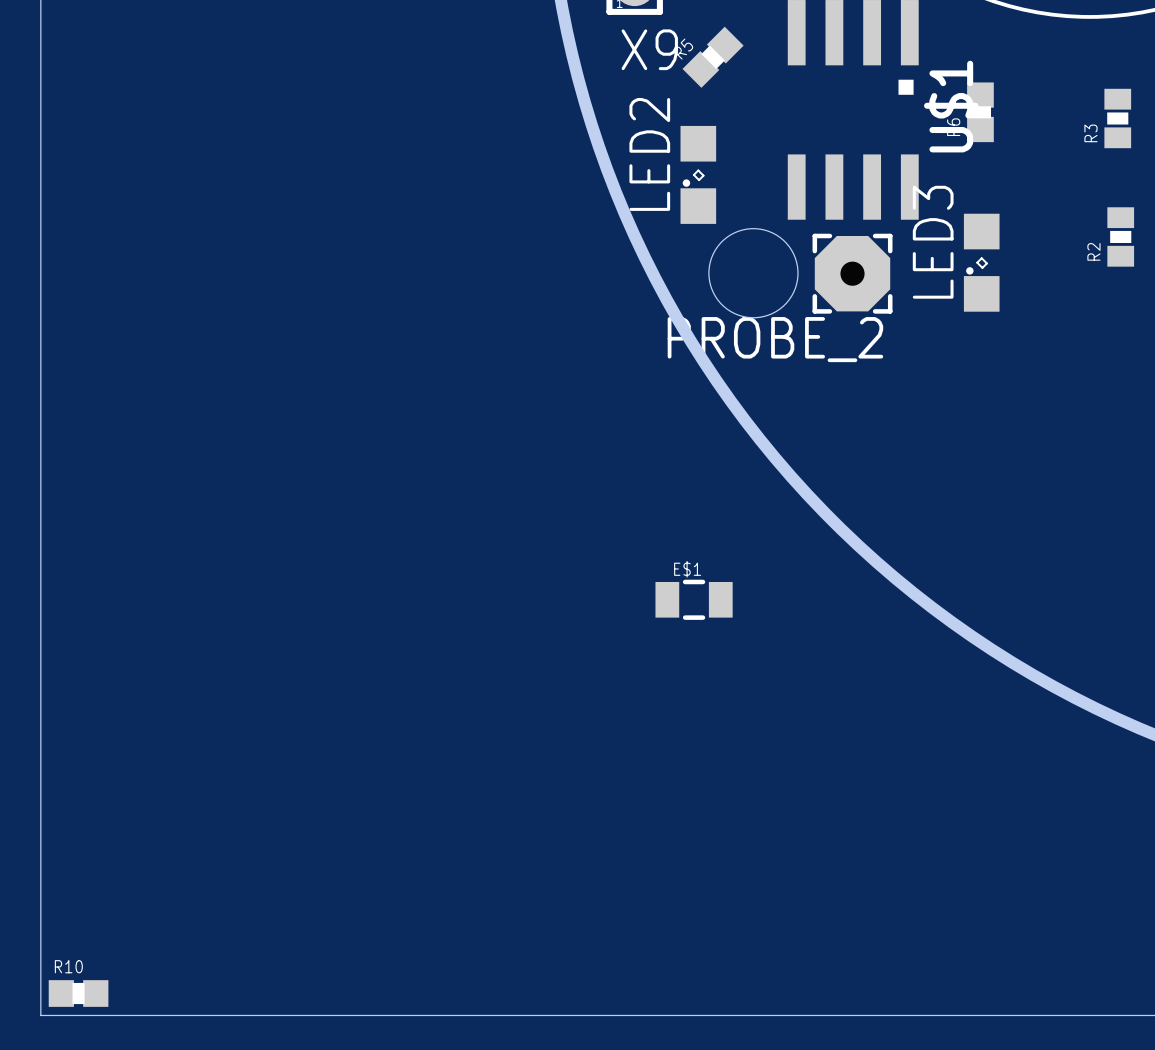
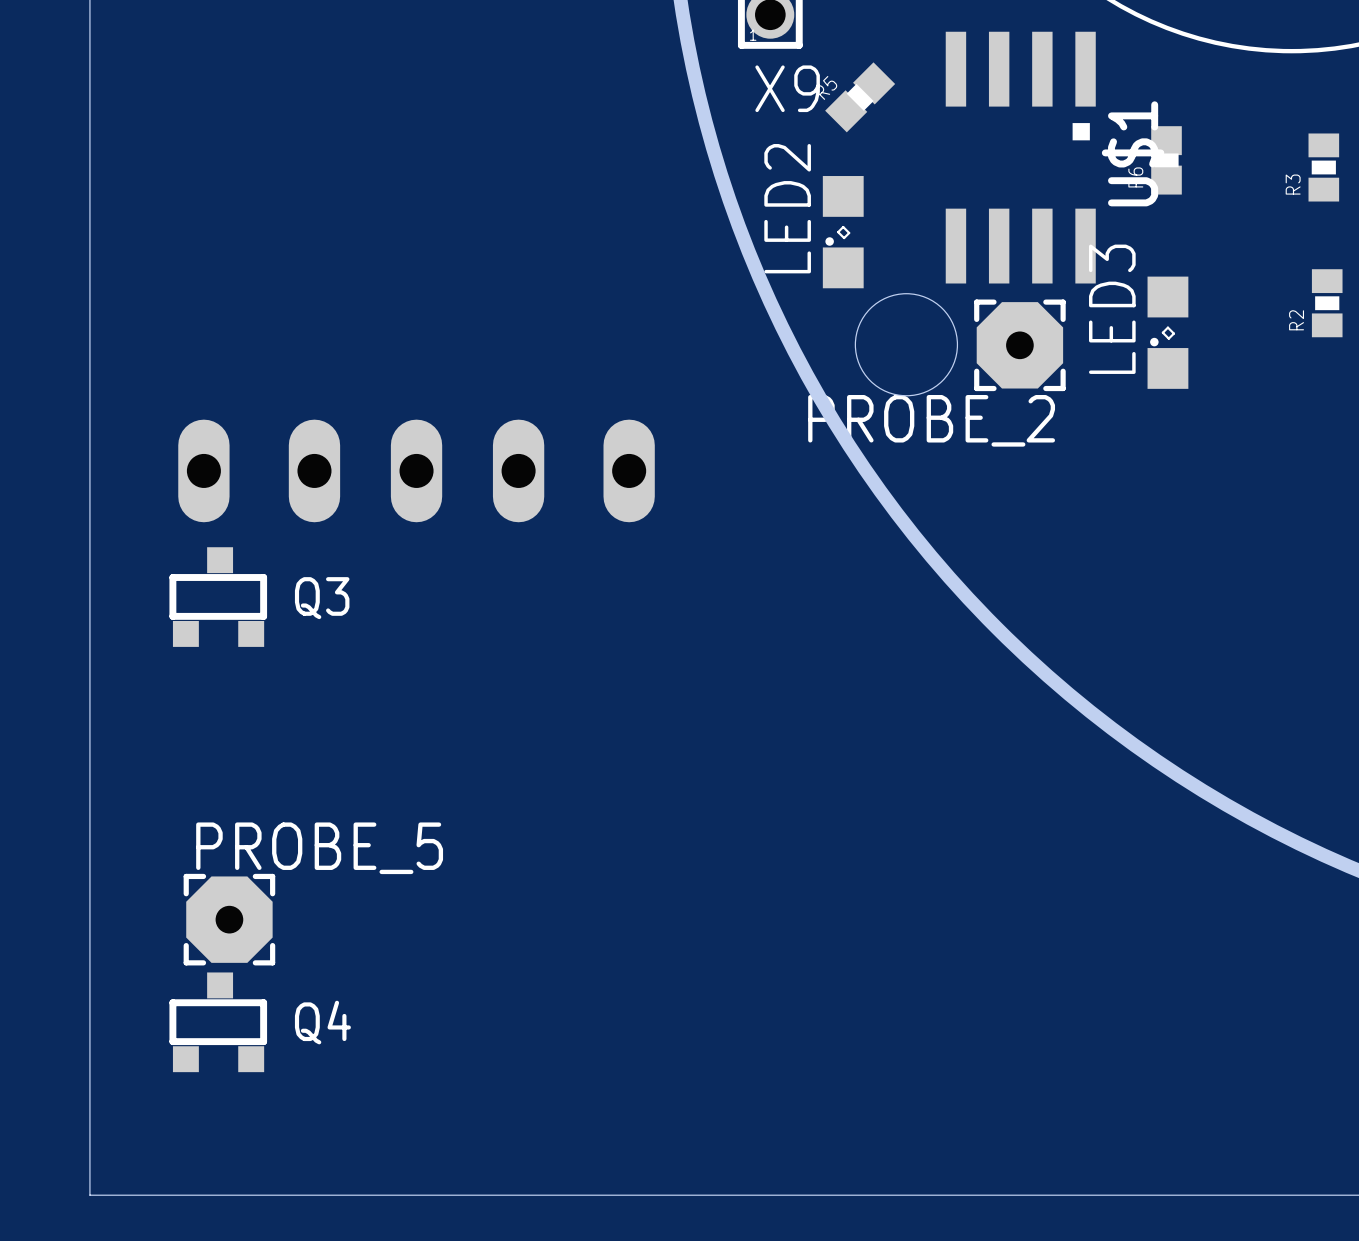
part: none -> (416, 470)
Q3: none -> (218, 597)
E$1: (694, 599) -> none
PROBE_5: none -> (229, 919)
Q4: none -> (218, 1022)
R10: (78, 993) -> none

